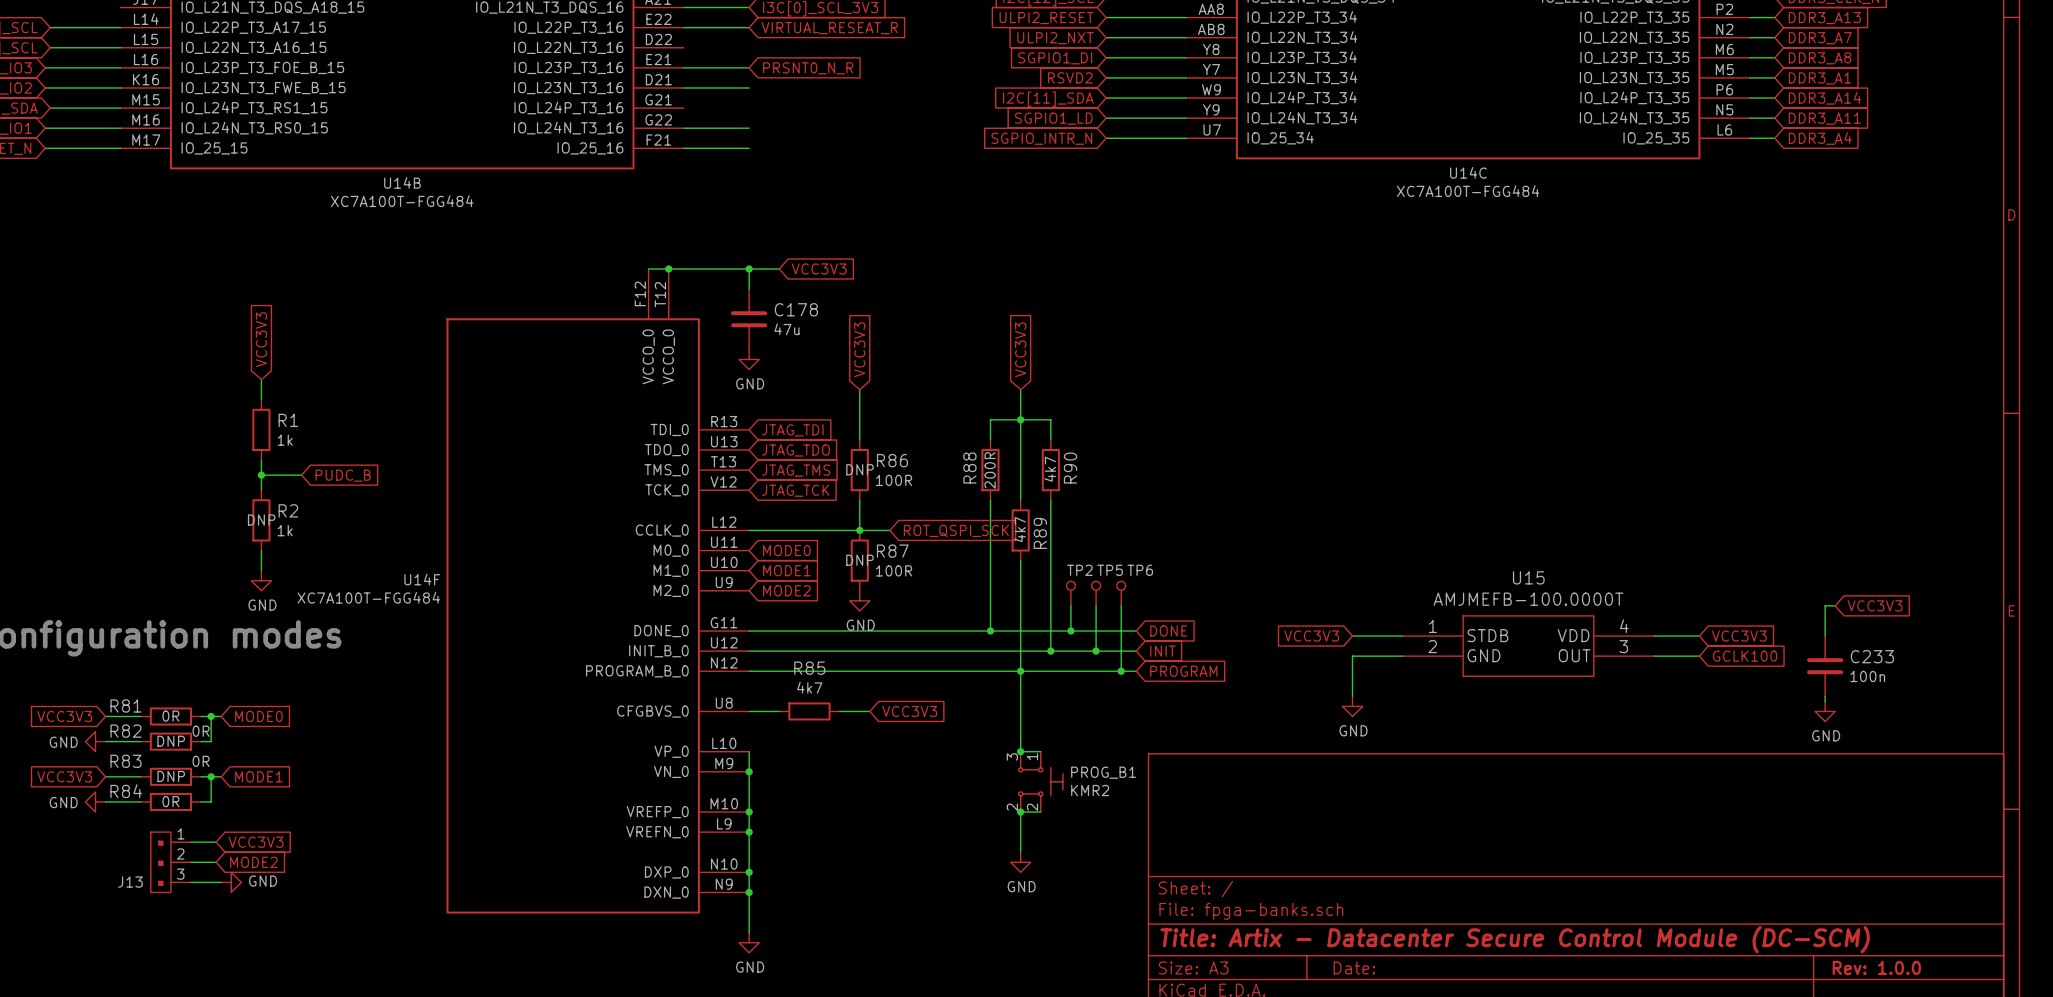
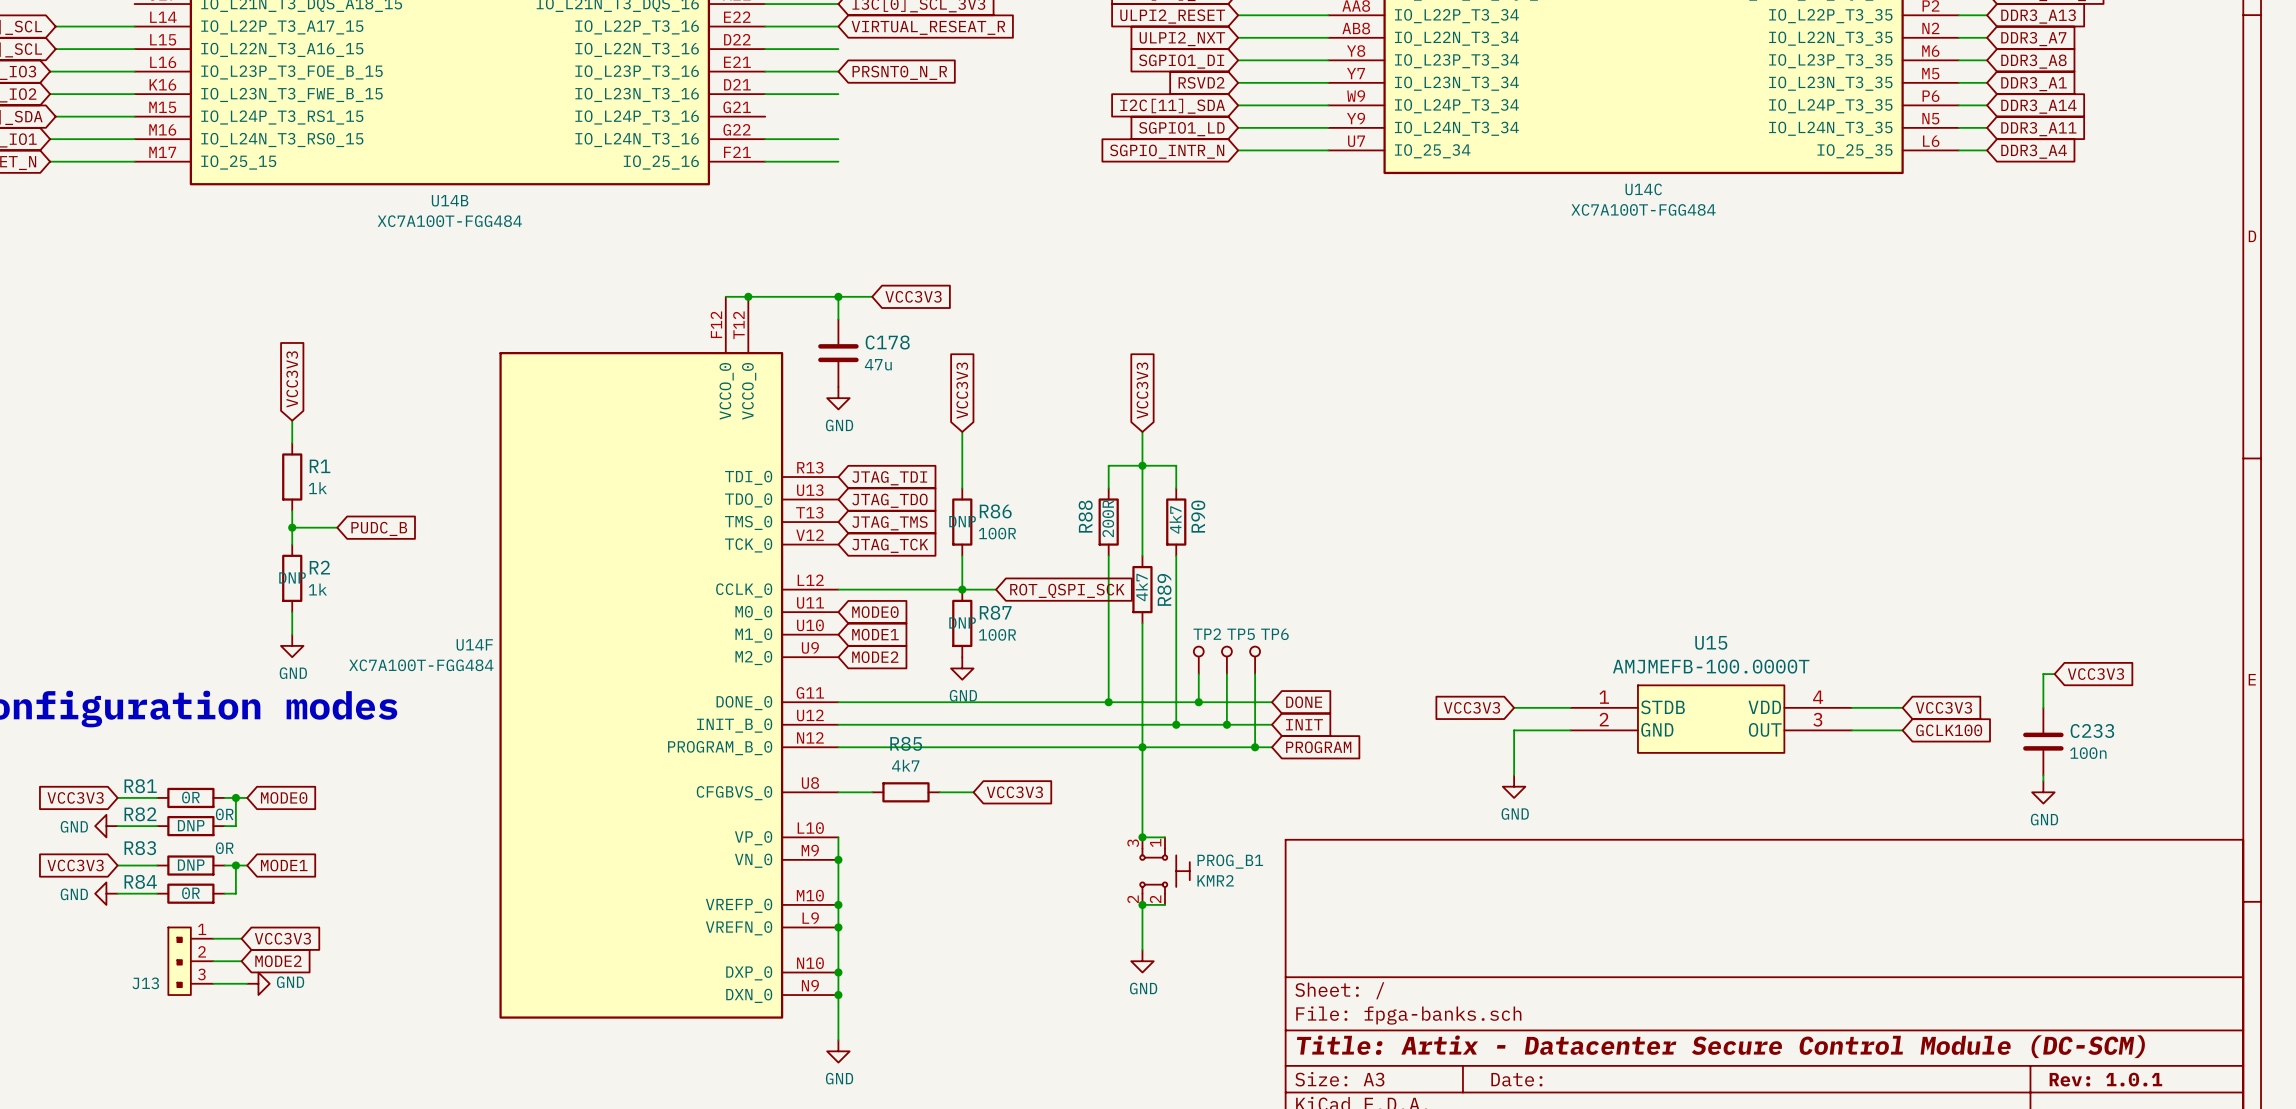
wire: none -> (765, 49) (838, 49)
title block: Rev: 1.0.0 (1876, 967) -> Rev: 1.0.1 (2105, 1079)

